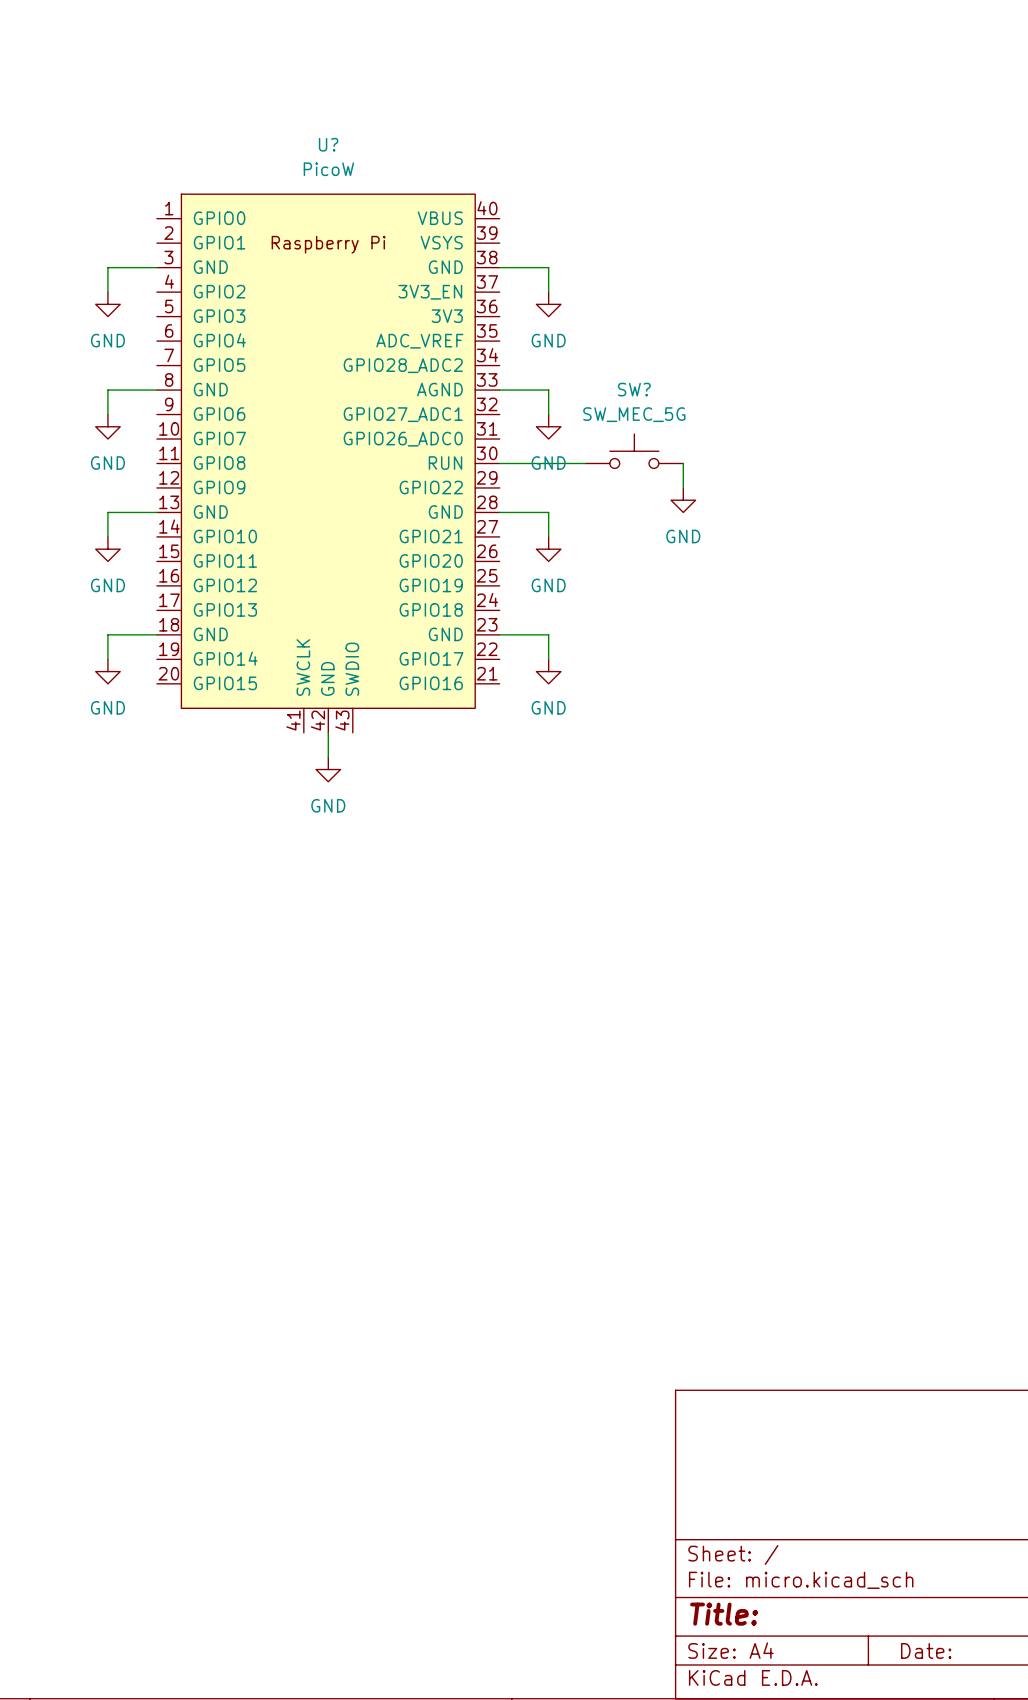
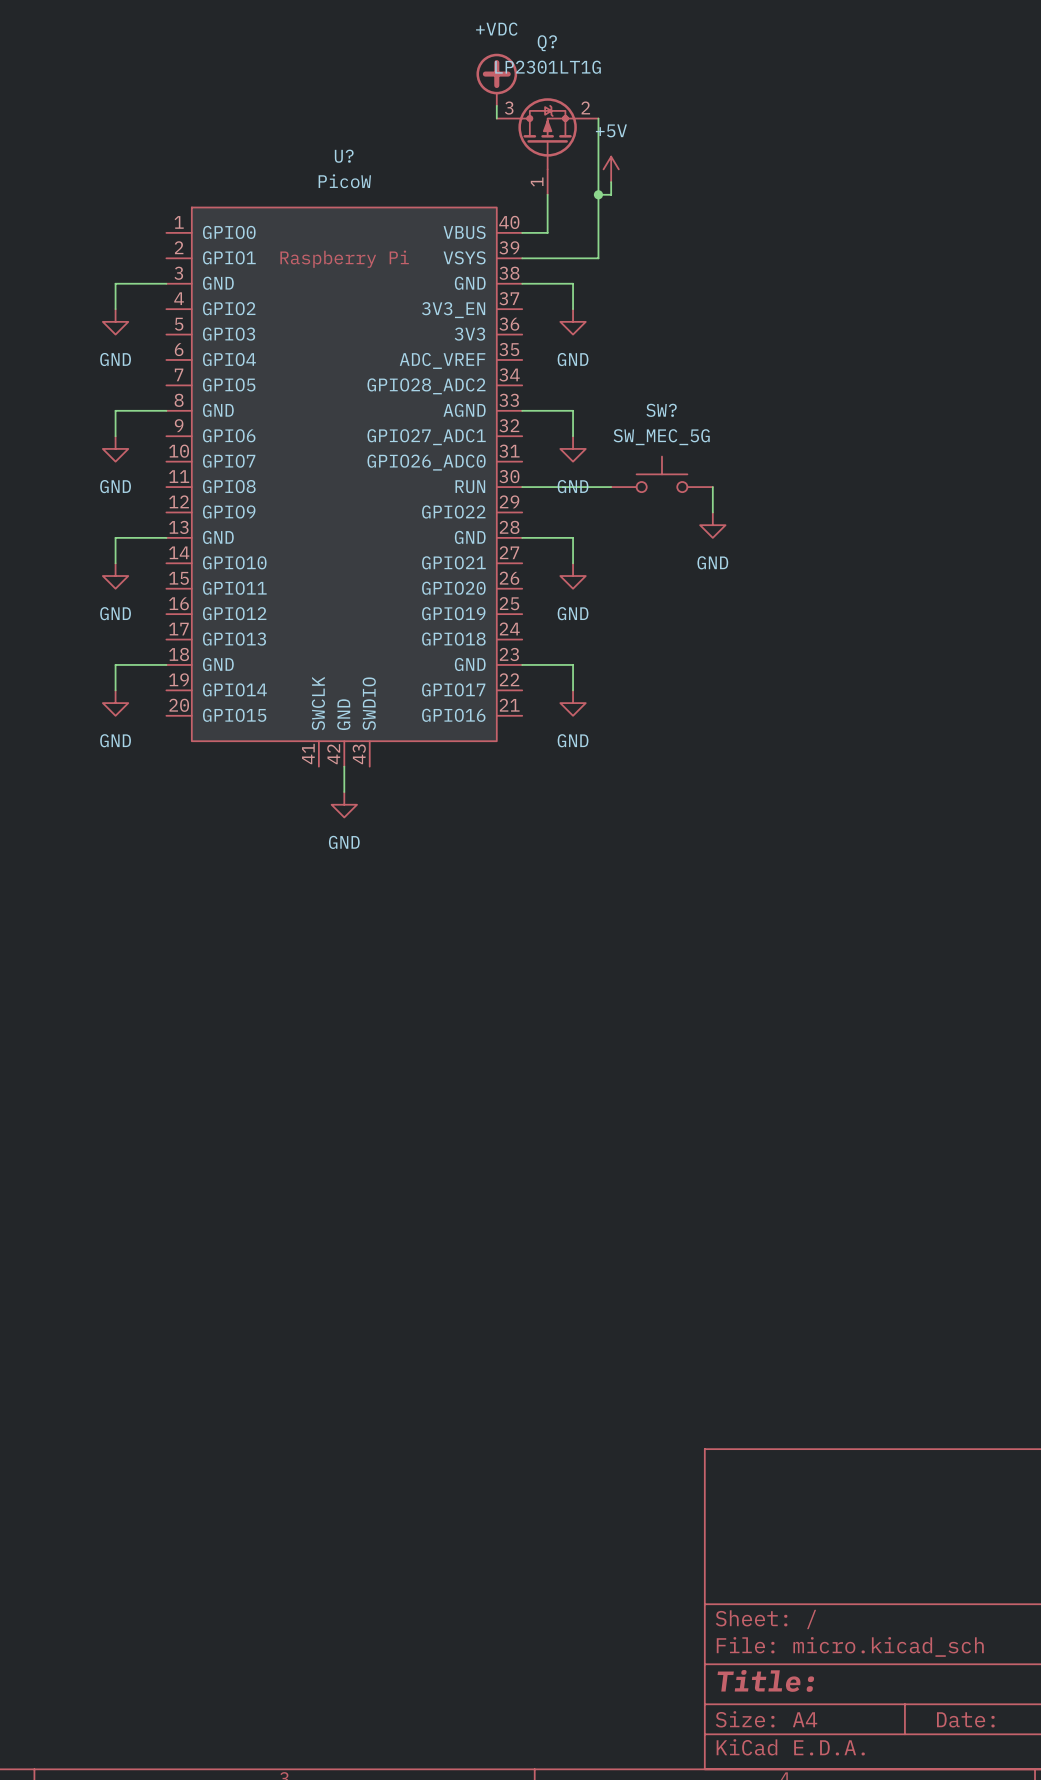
power symbol: none -> +VDC (496, 79)
wire: none -> (496, 105) (496, 118)
wire: none -> (598, 118) (598, 258) (522, 258)
Q?: none -> LP2301LT1G (547, 146)
power symbol: none -> +5V (611, 169)
wire: none -> (611, 182) (611, 194) (598, 194)
wire: none -> (547, 194) (547, 232) (522, 232)
junction: none -> (598, 194)

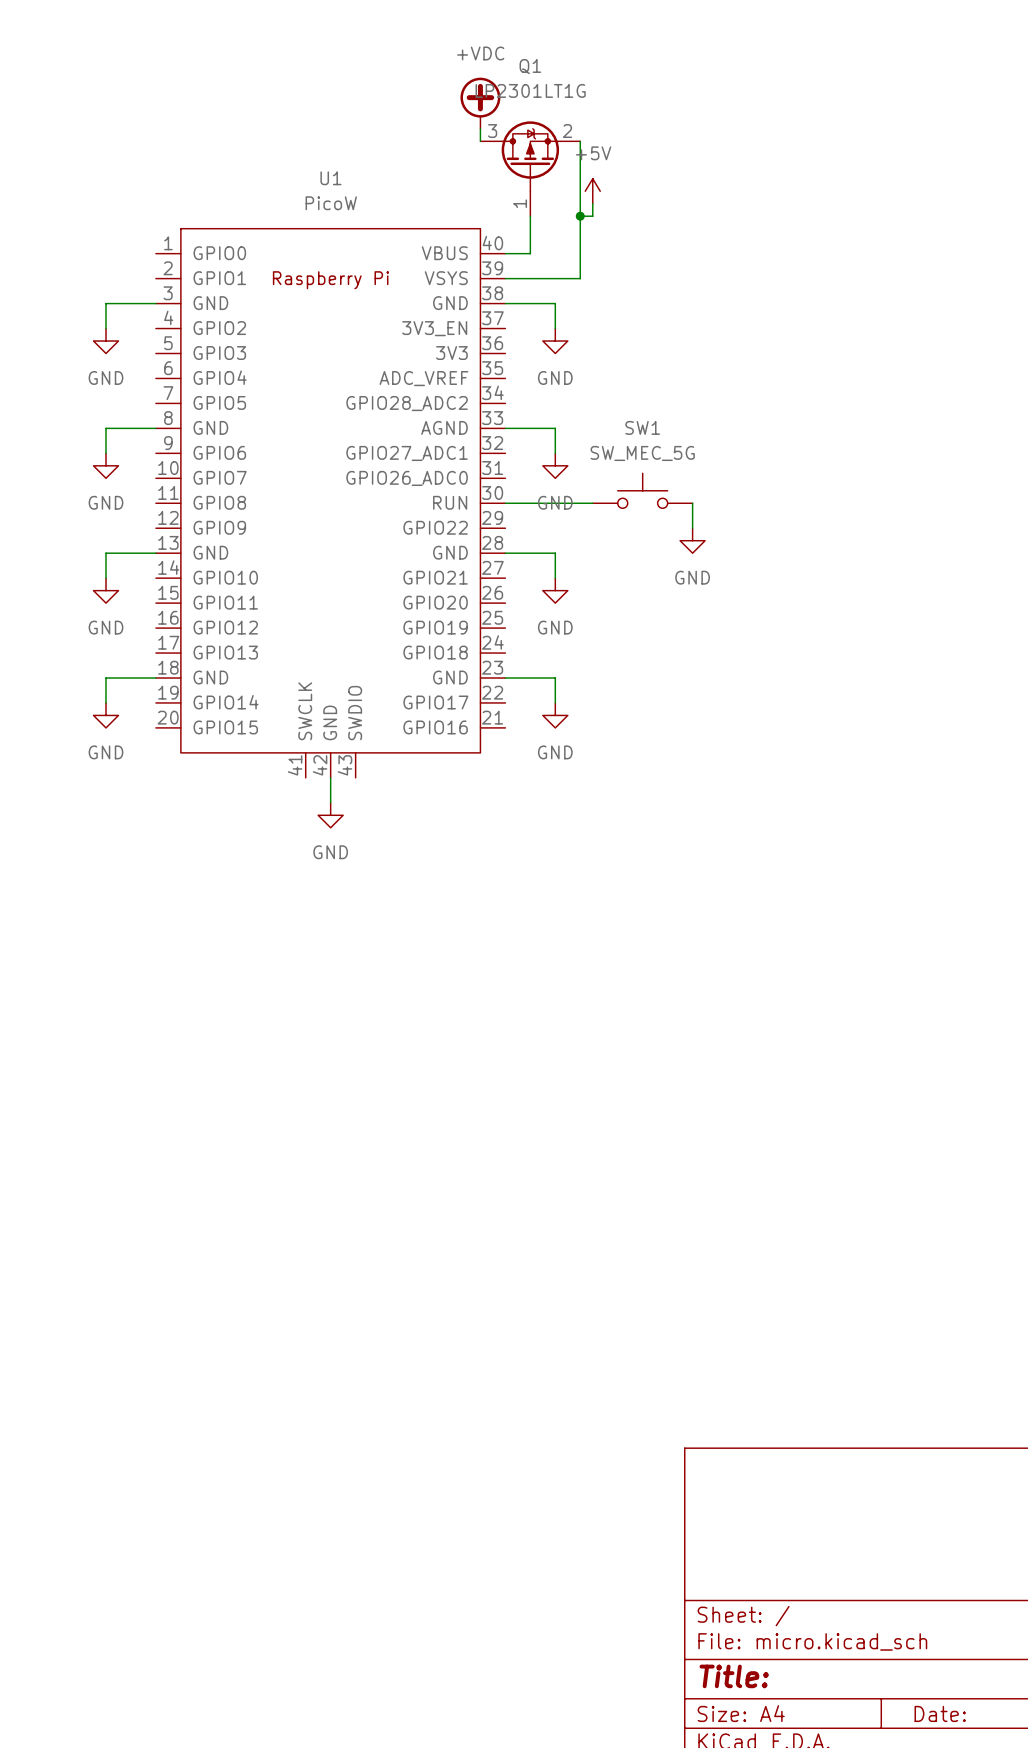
Q? name: Q? (547, 43) -> Q1 (530, 66)
U? name: U? (344, 156) -> U1 (330, 178)
SW? name: SW? (661, 410) -> SW1 (642, 427)

